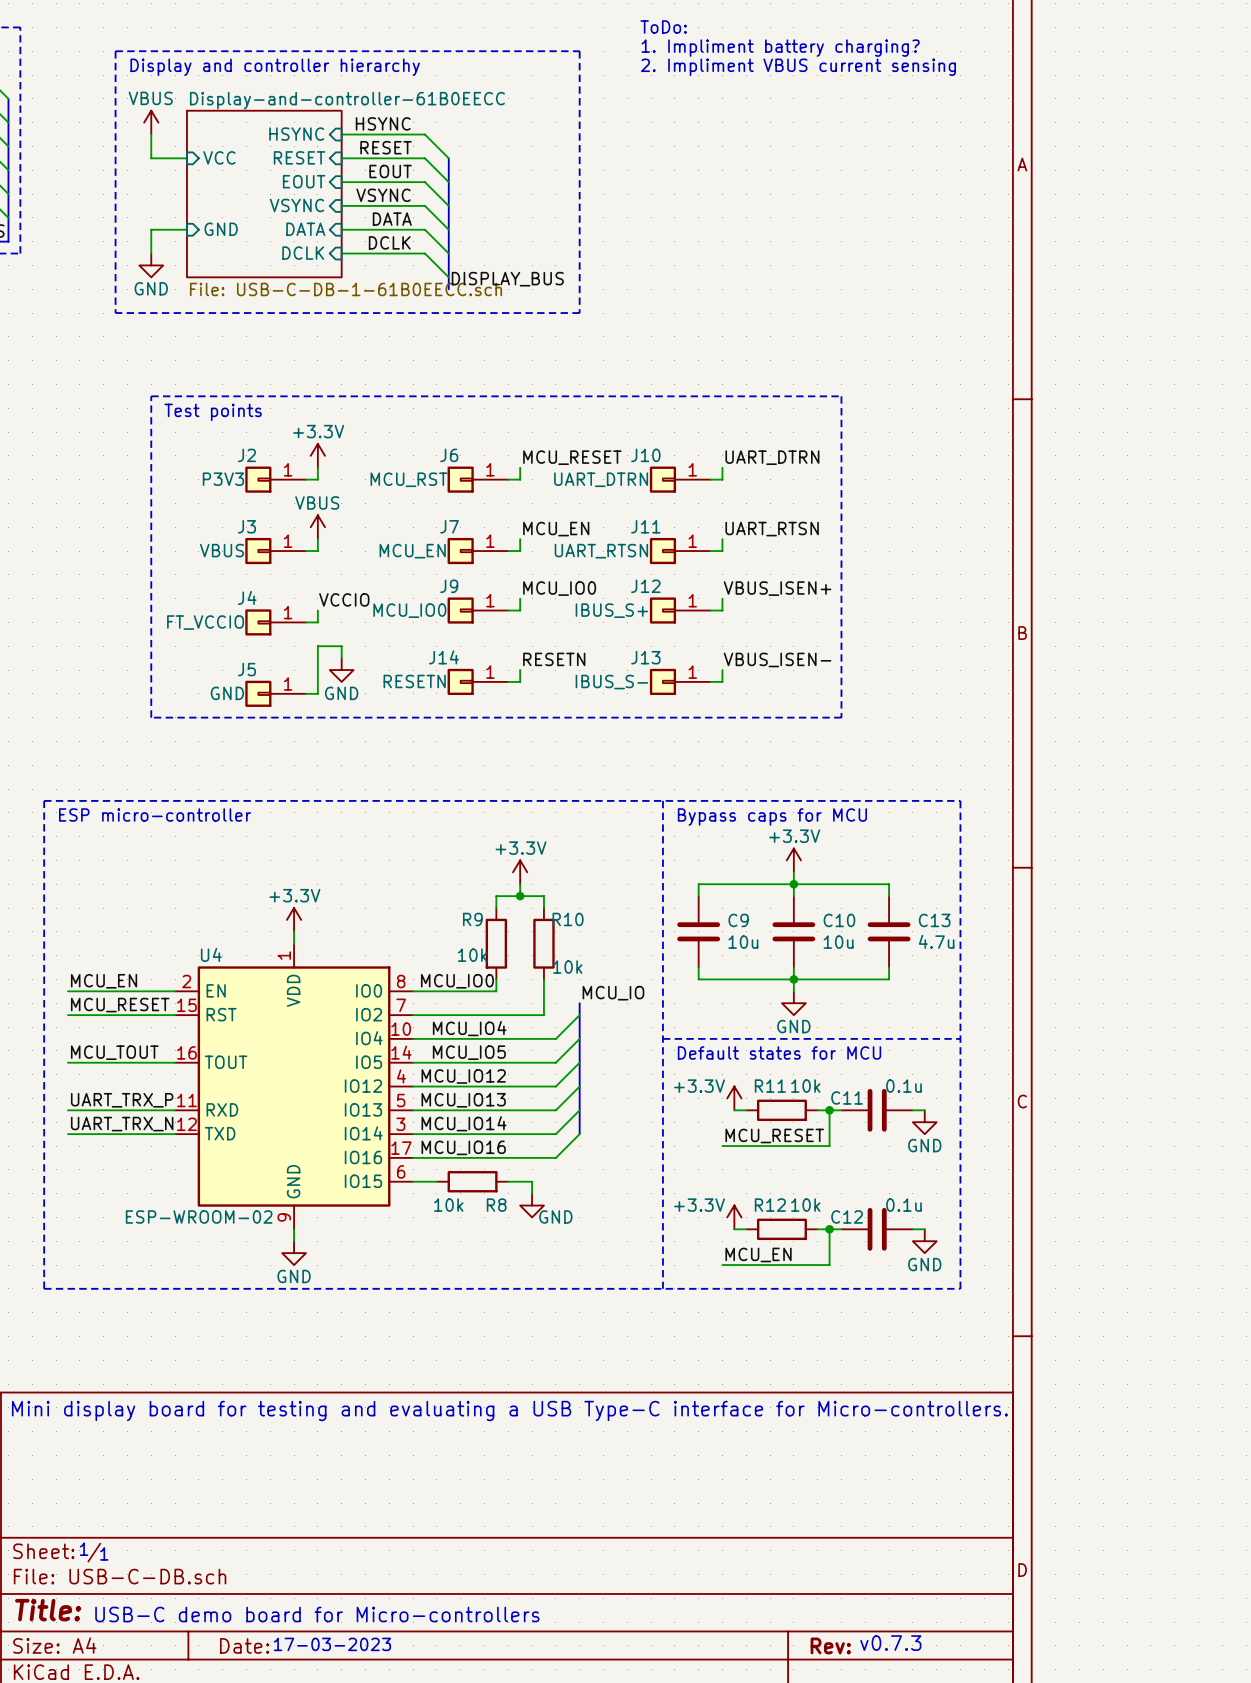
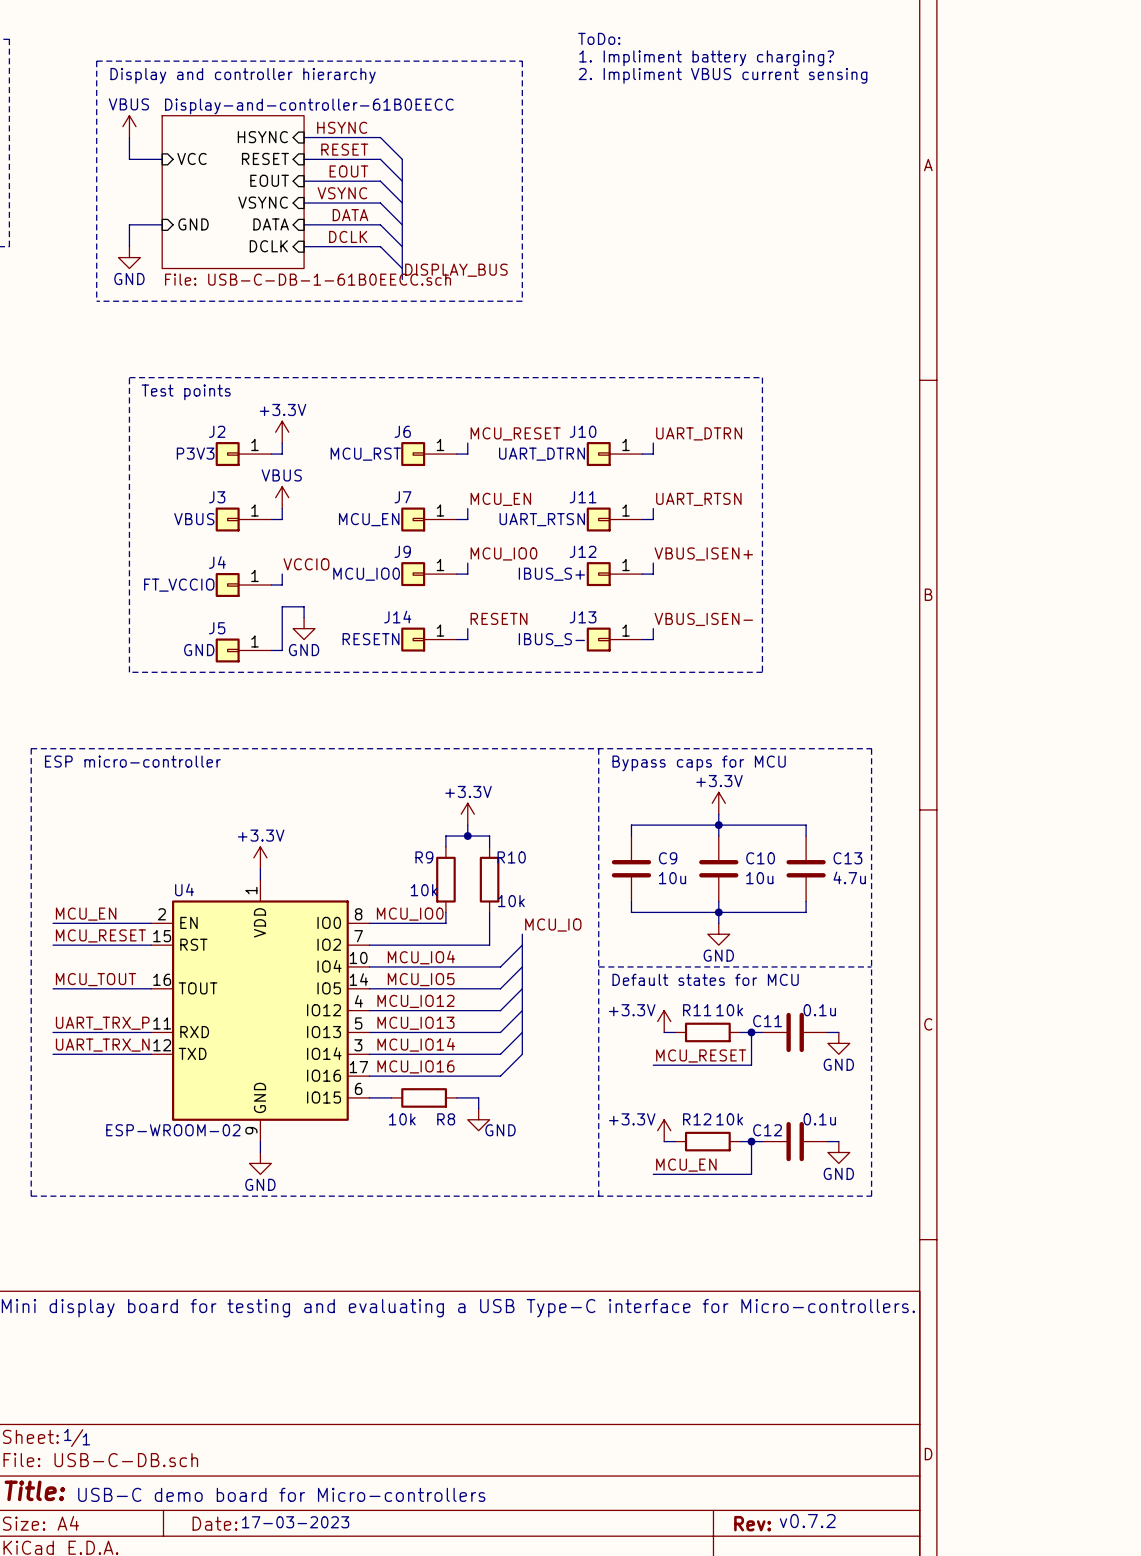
text: v0.7.3 (890, 1643) -> v0.7.2 (807, 1521)

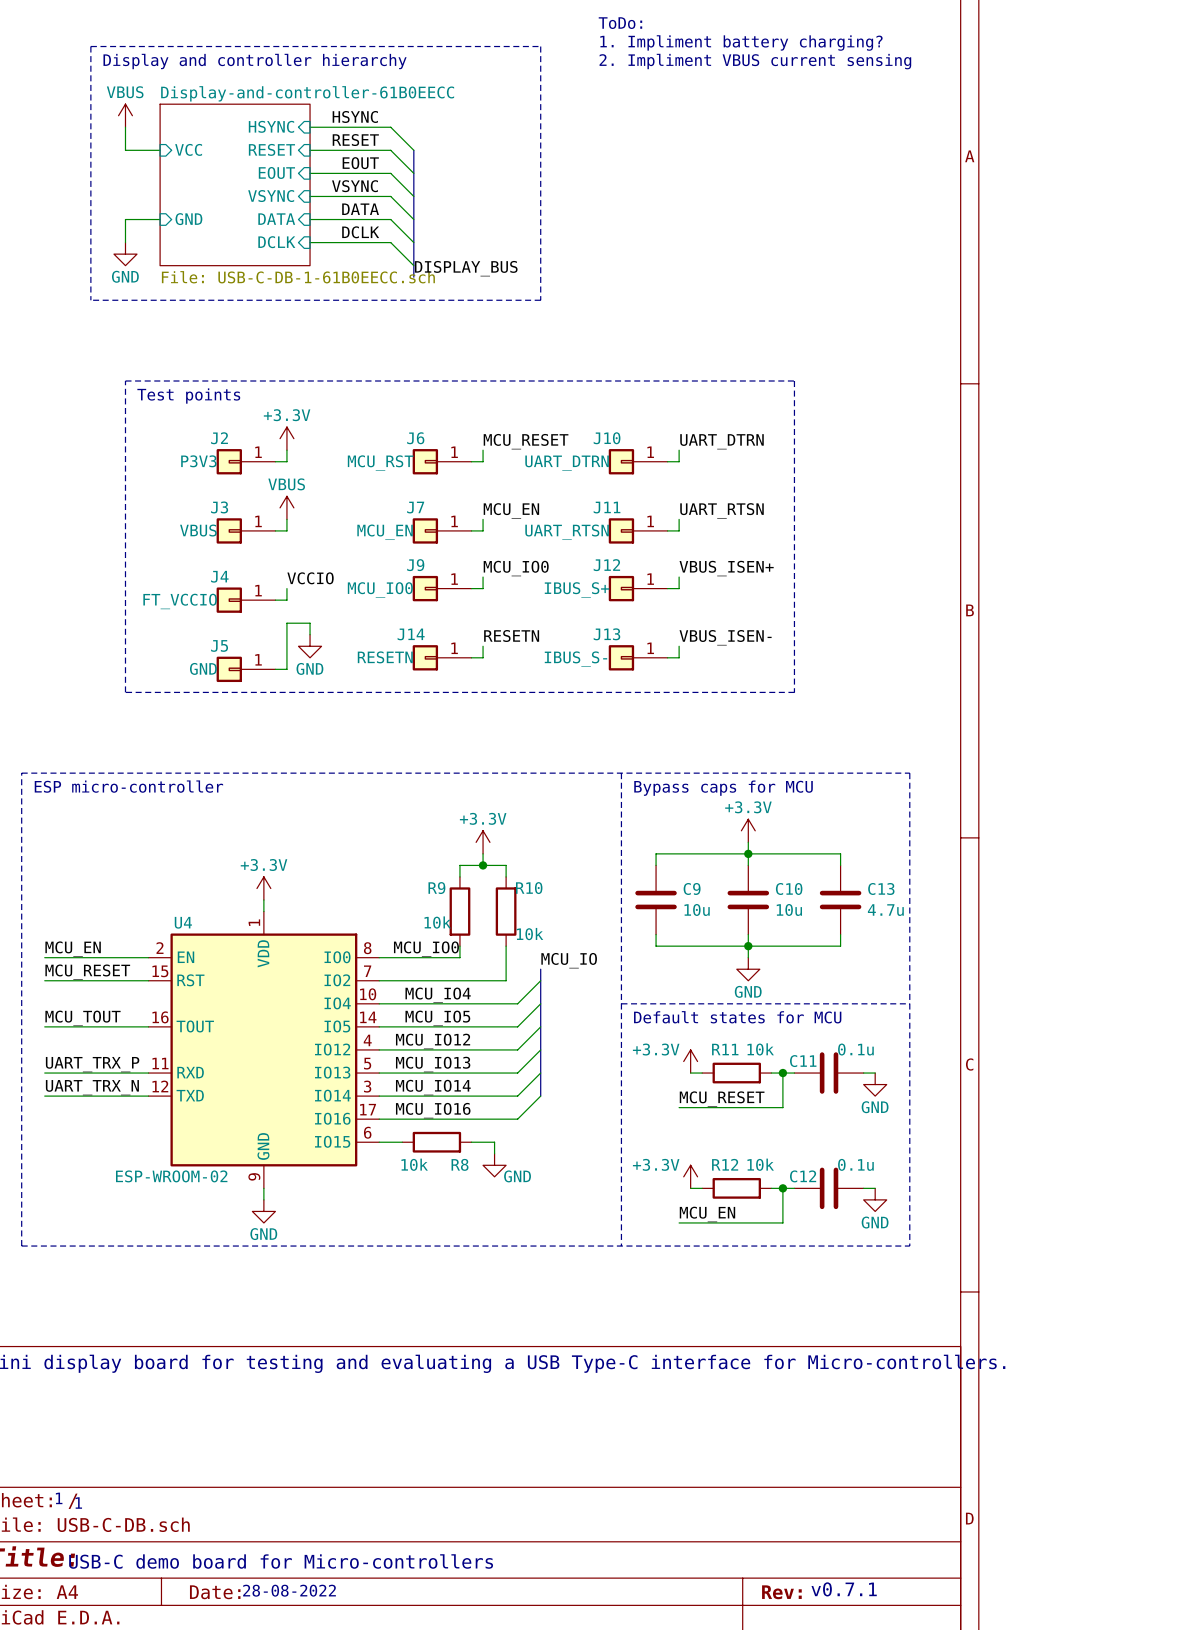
text: v0.7.2 (807, 1521) -> v0.7.1 (844, 1589)
text: 17-03-2023 (295, 1522) -> 28-08-2022 (289, 1590)

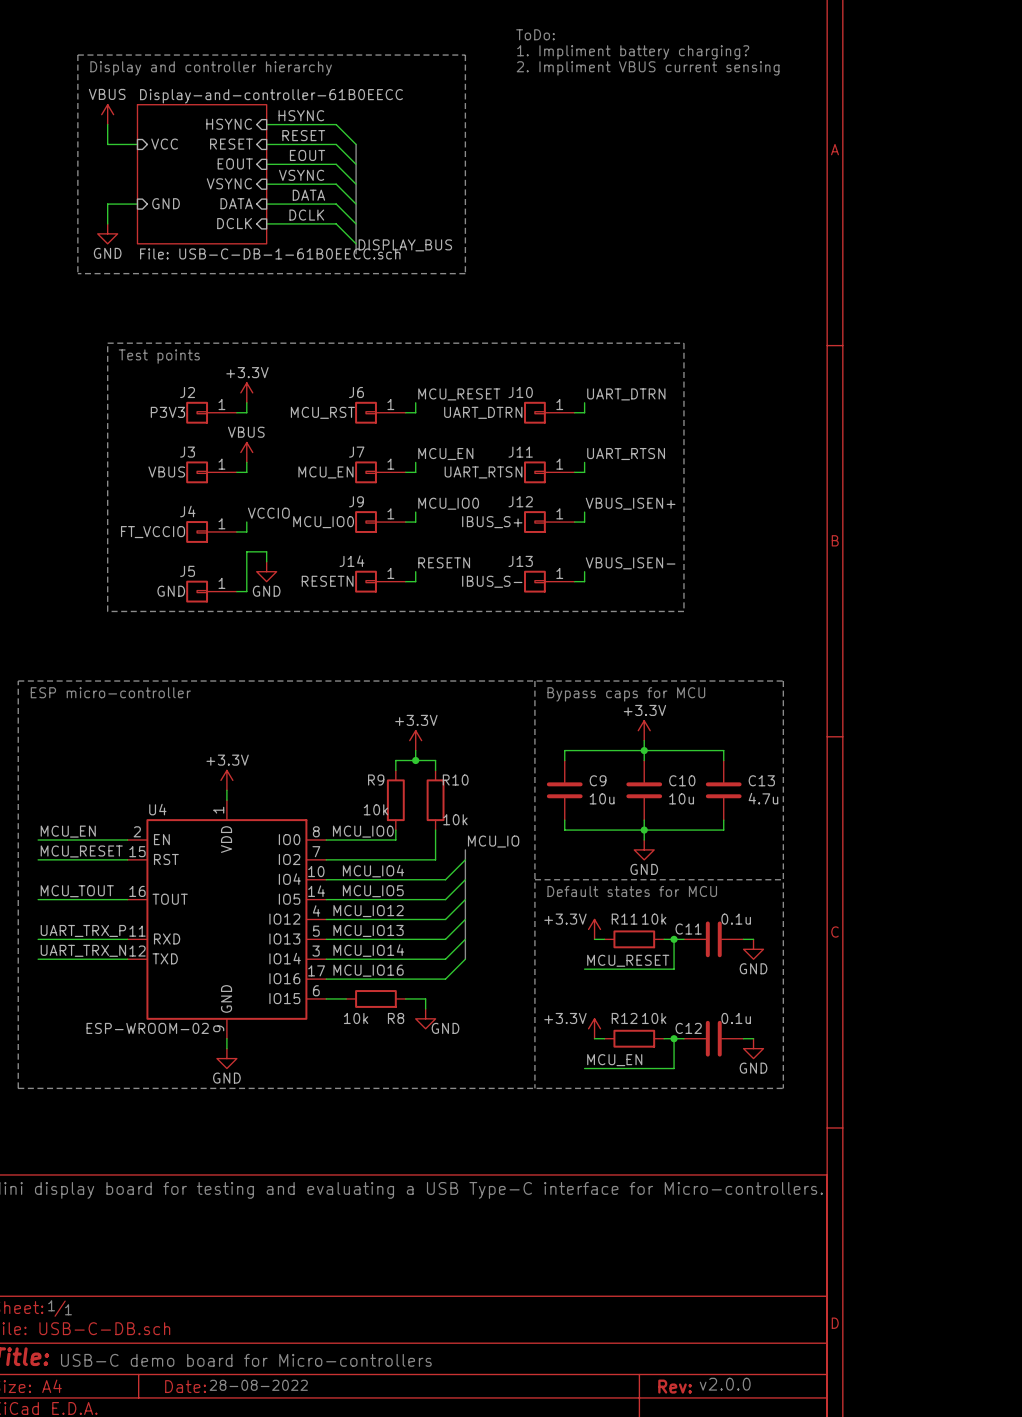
text: v0.7.1 (844, 1589) -> v2.0.0 (725, 1384)

